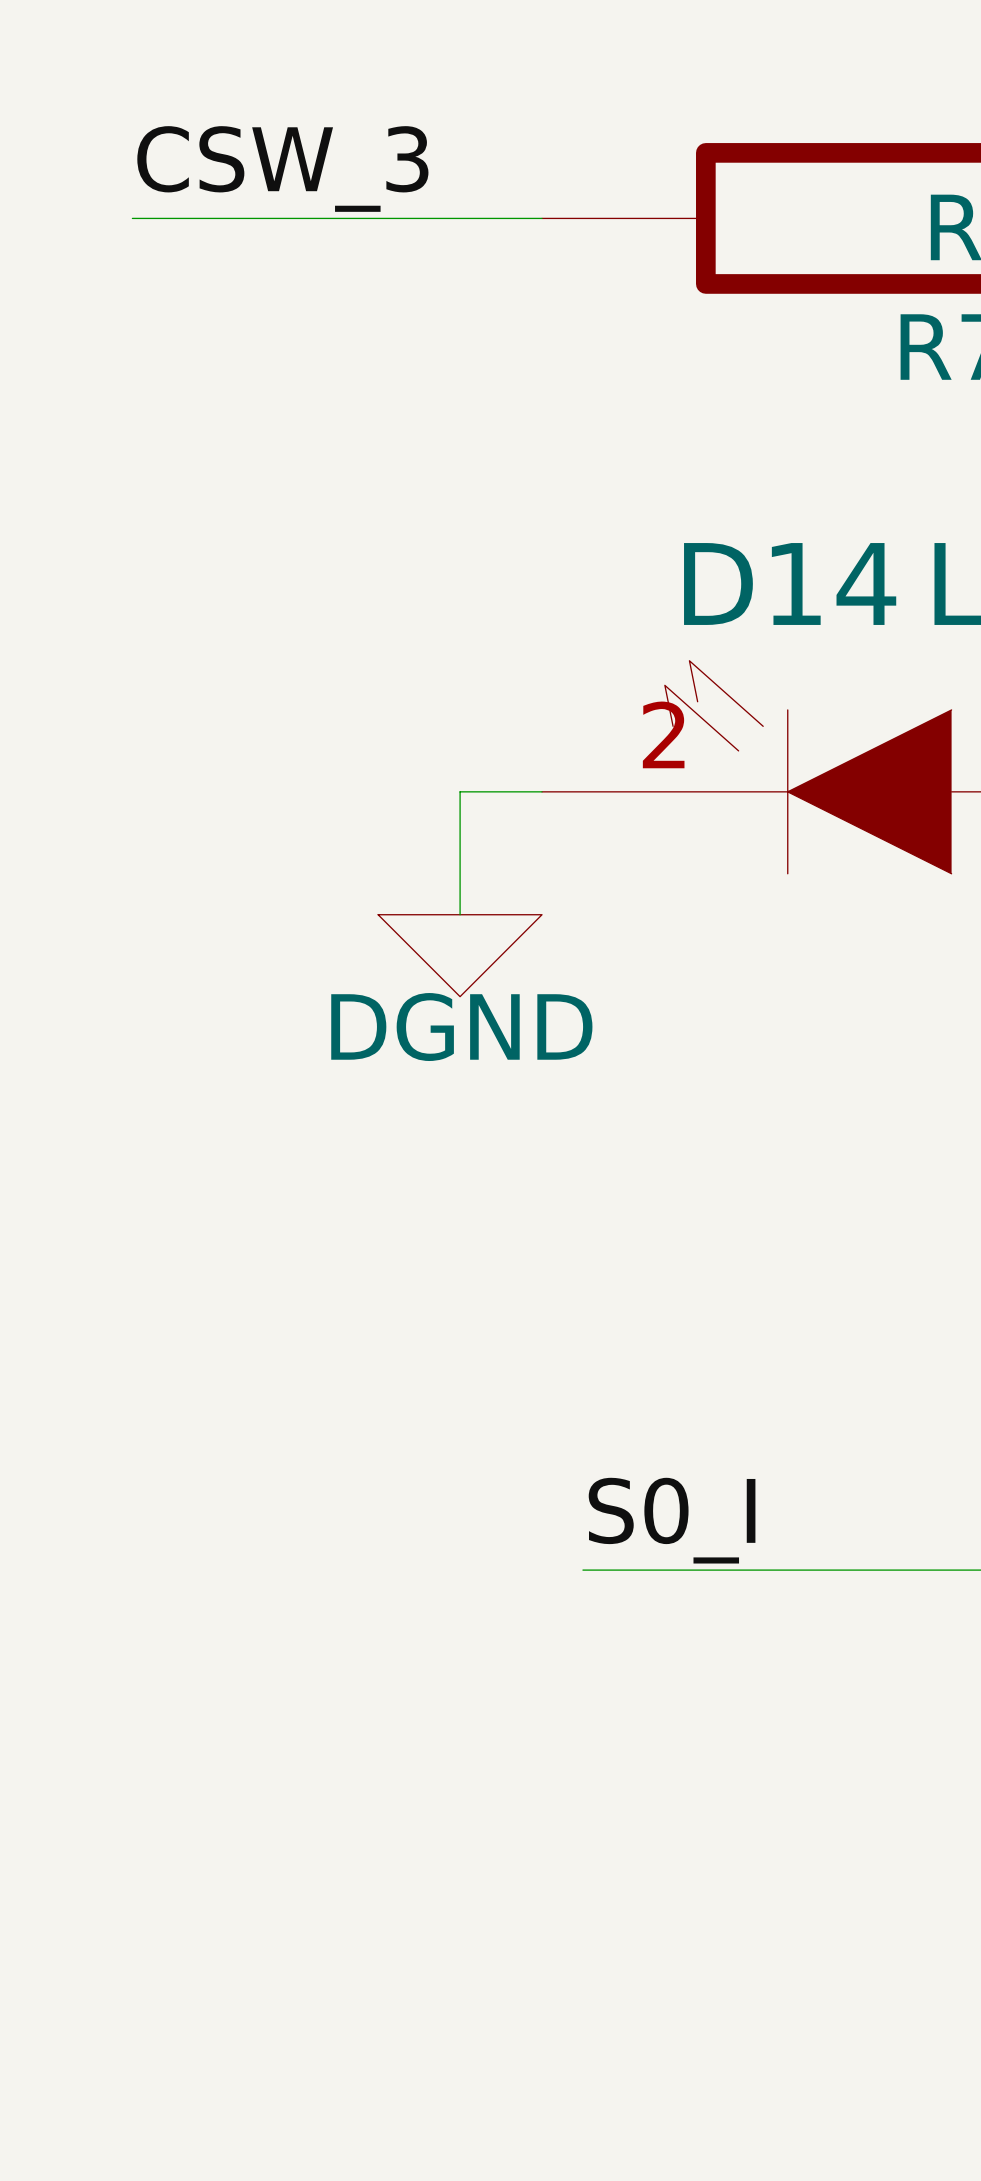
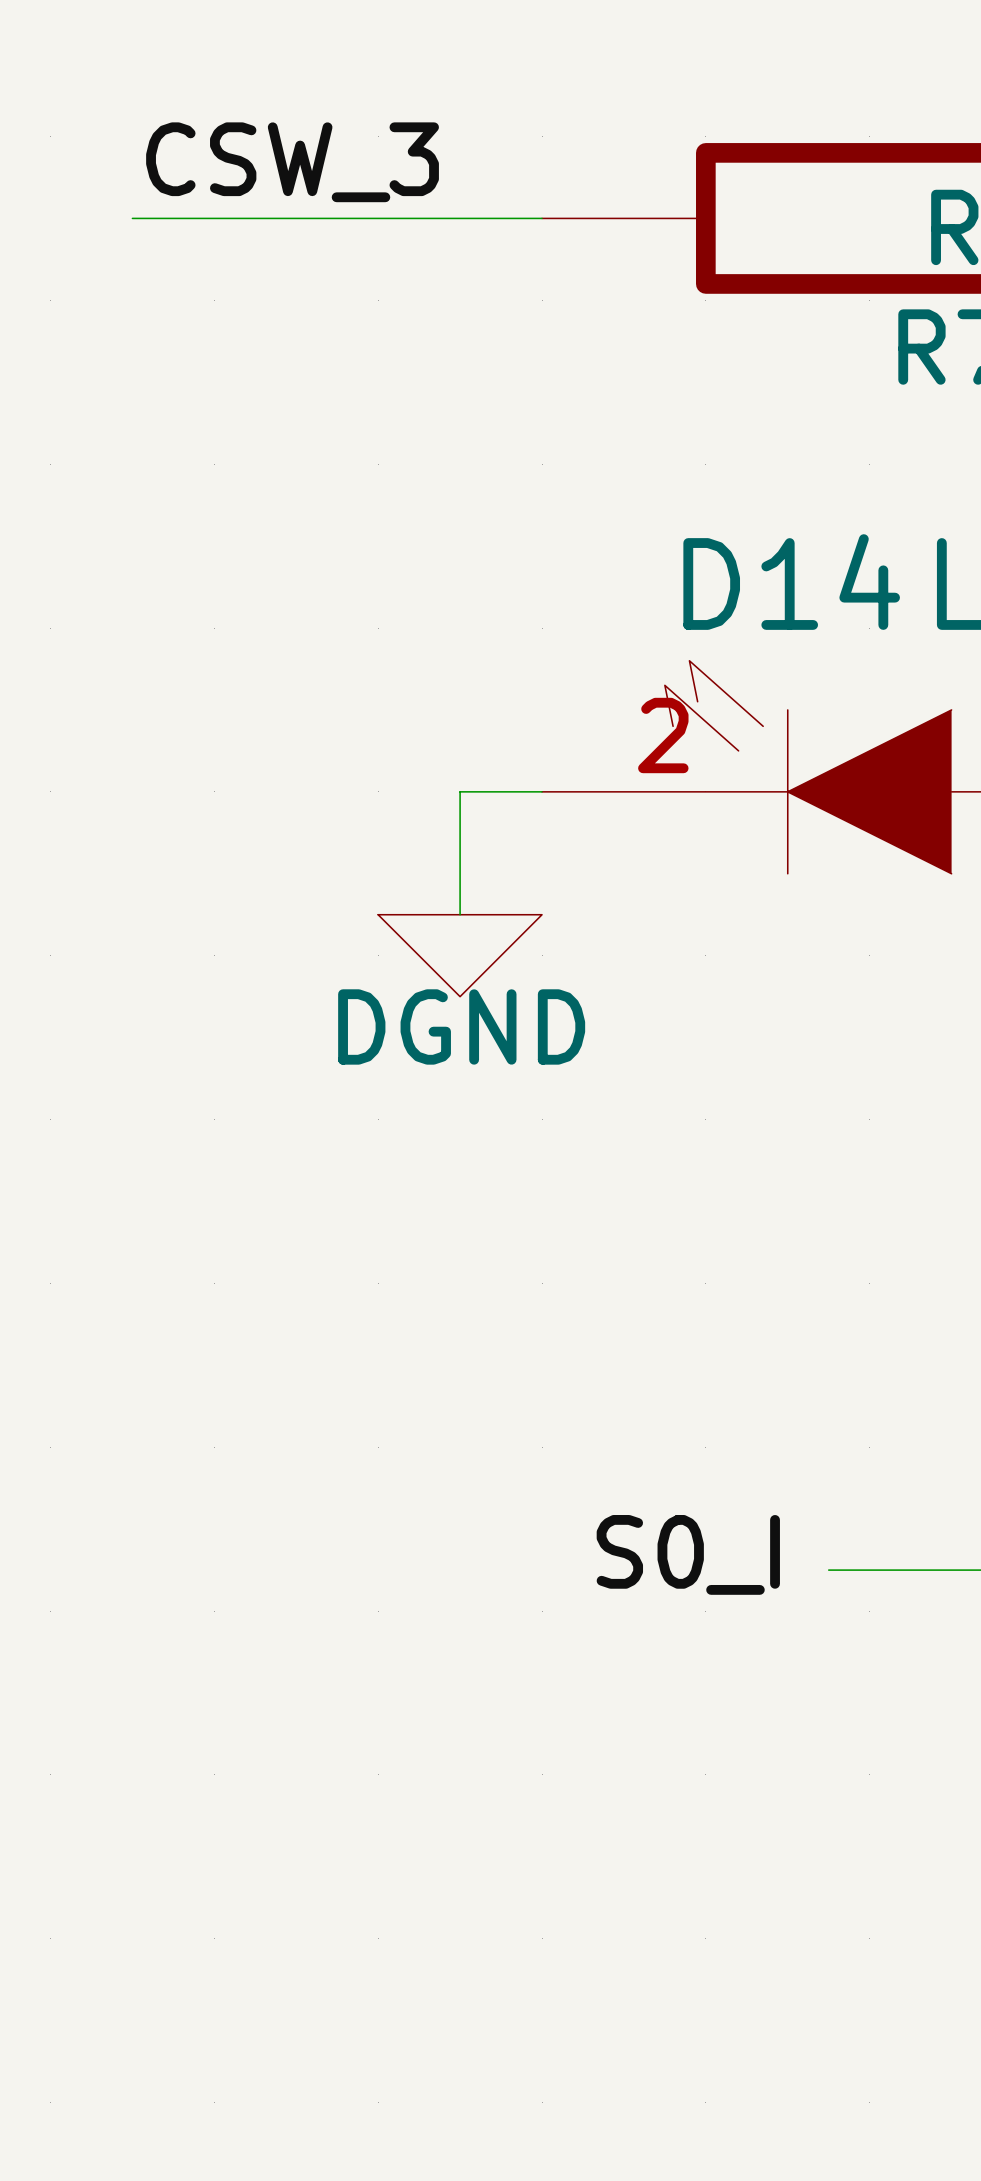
label position: S0_I (672, 1520) -> S0_I (688, 1554)
wire: (582, 1570) (828, 1570) -> none

